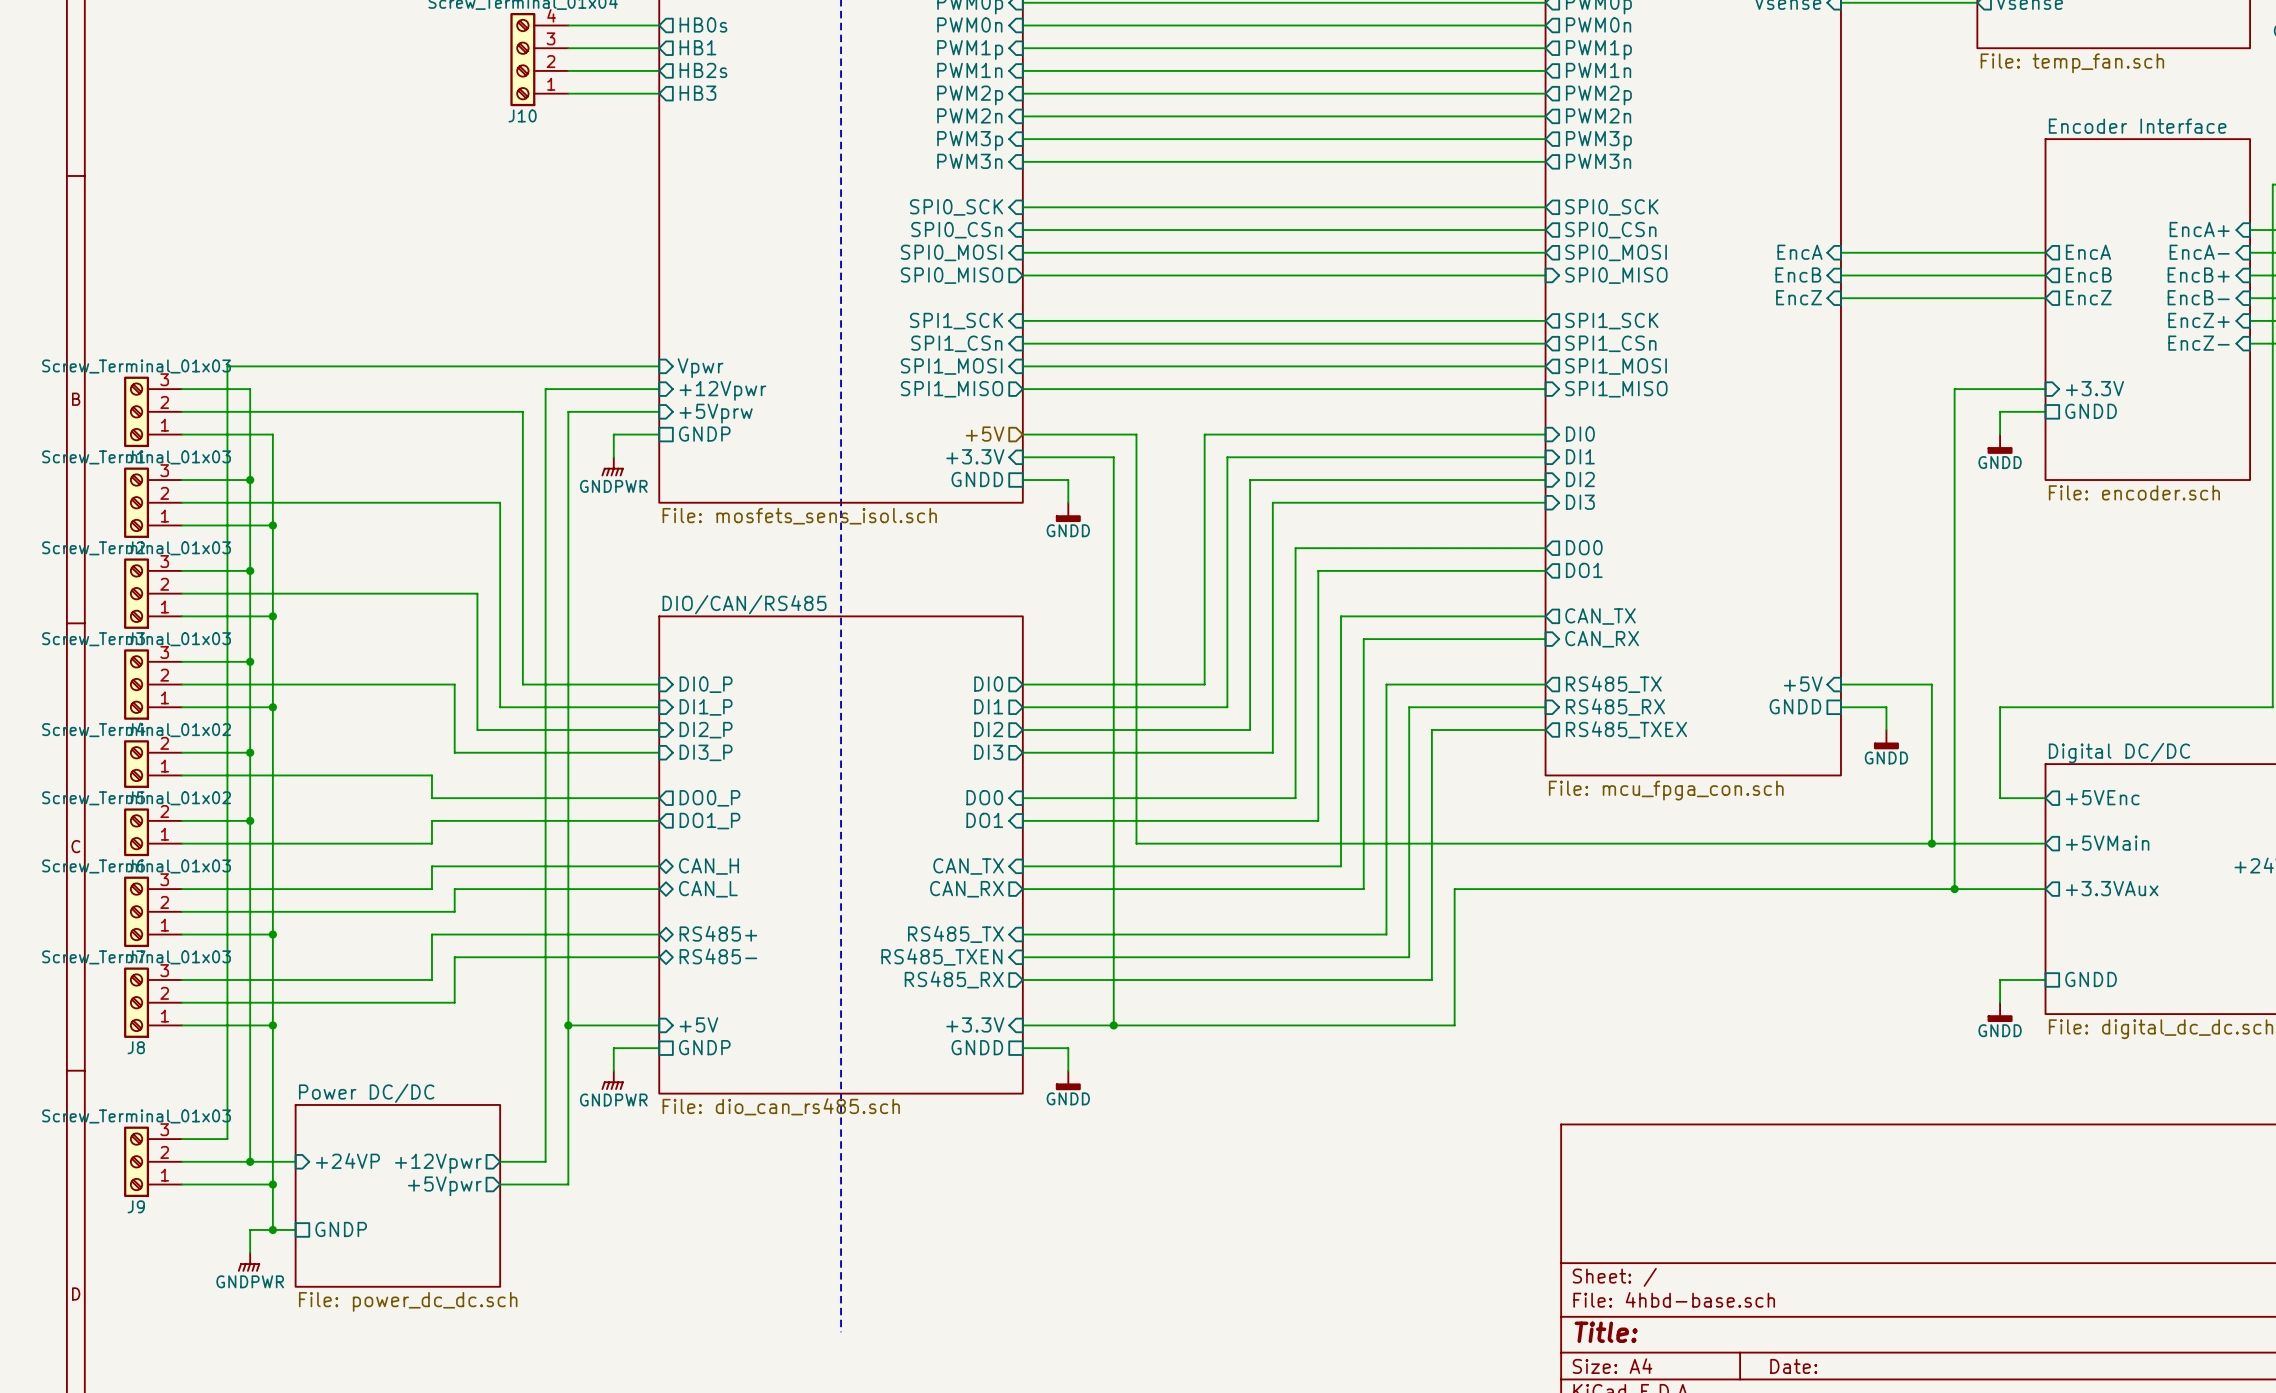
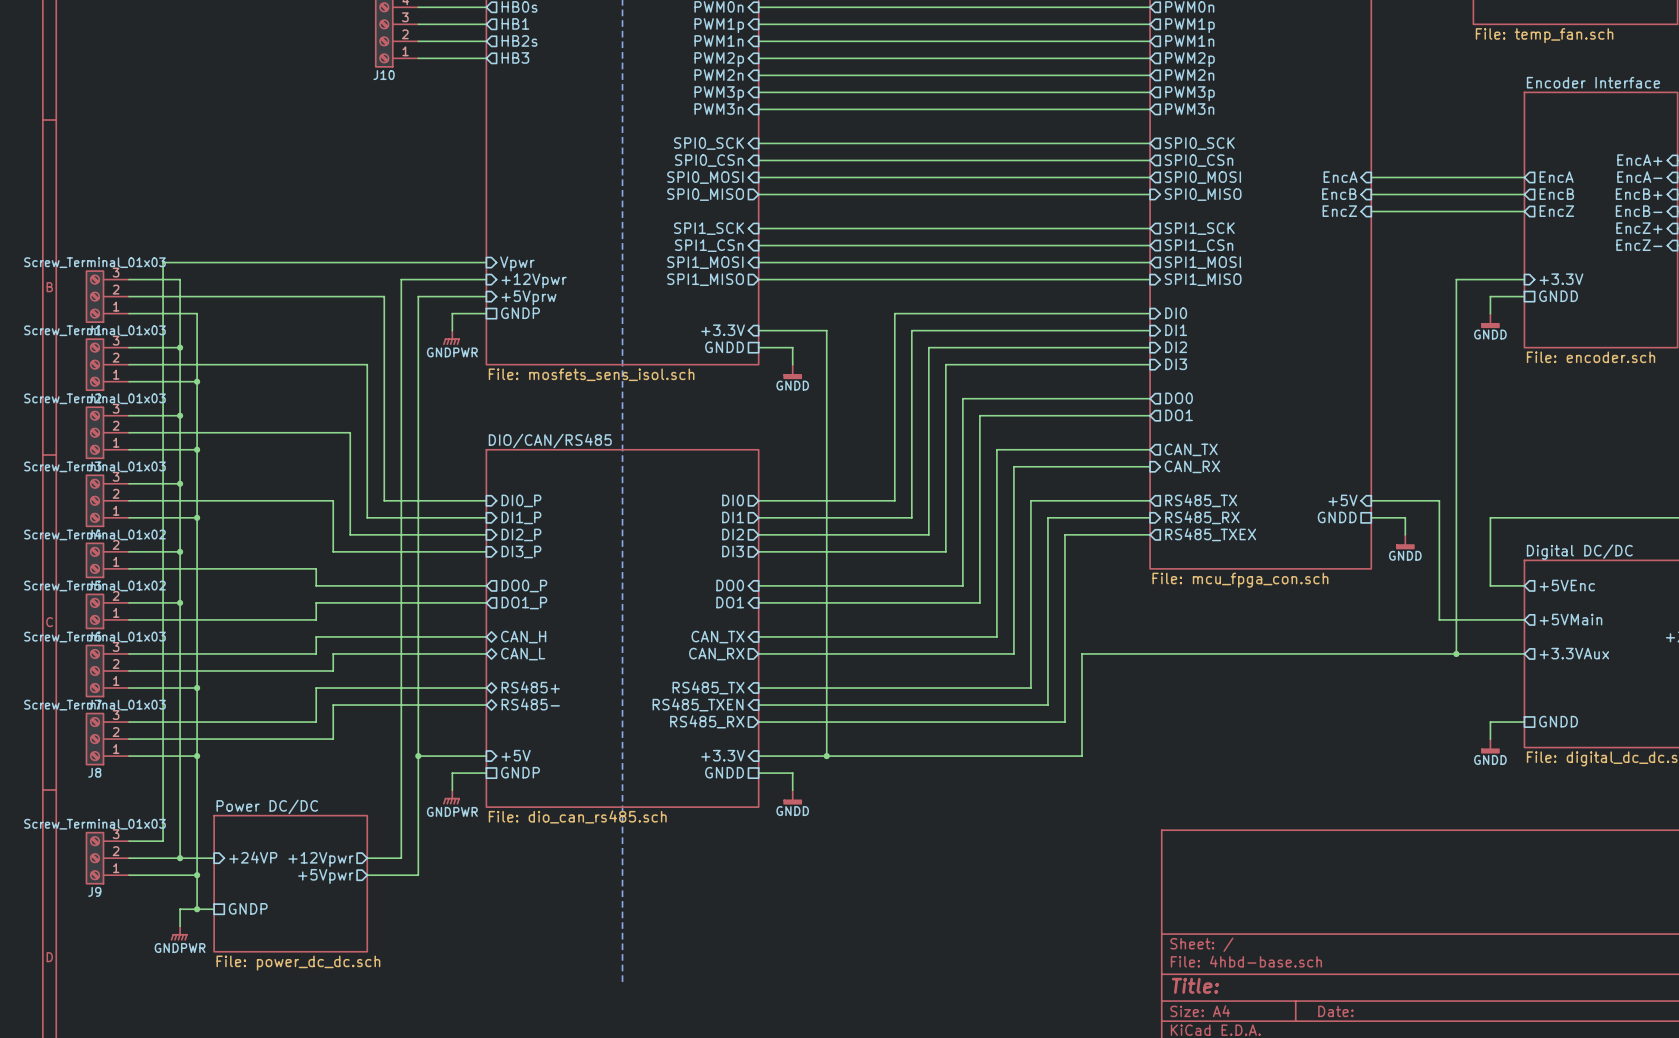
hierarchical label: +5V (985, 434) -> none
wire: (1022, 434) (1136, 434) (1136, 843) (1931, 843) -> none
junction: (1931, 843) -> none

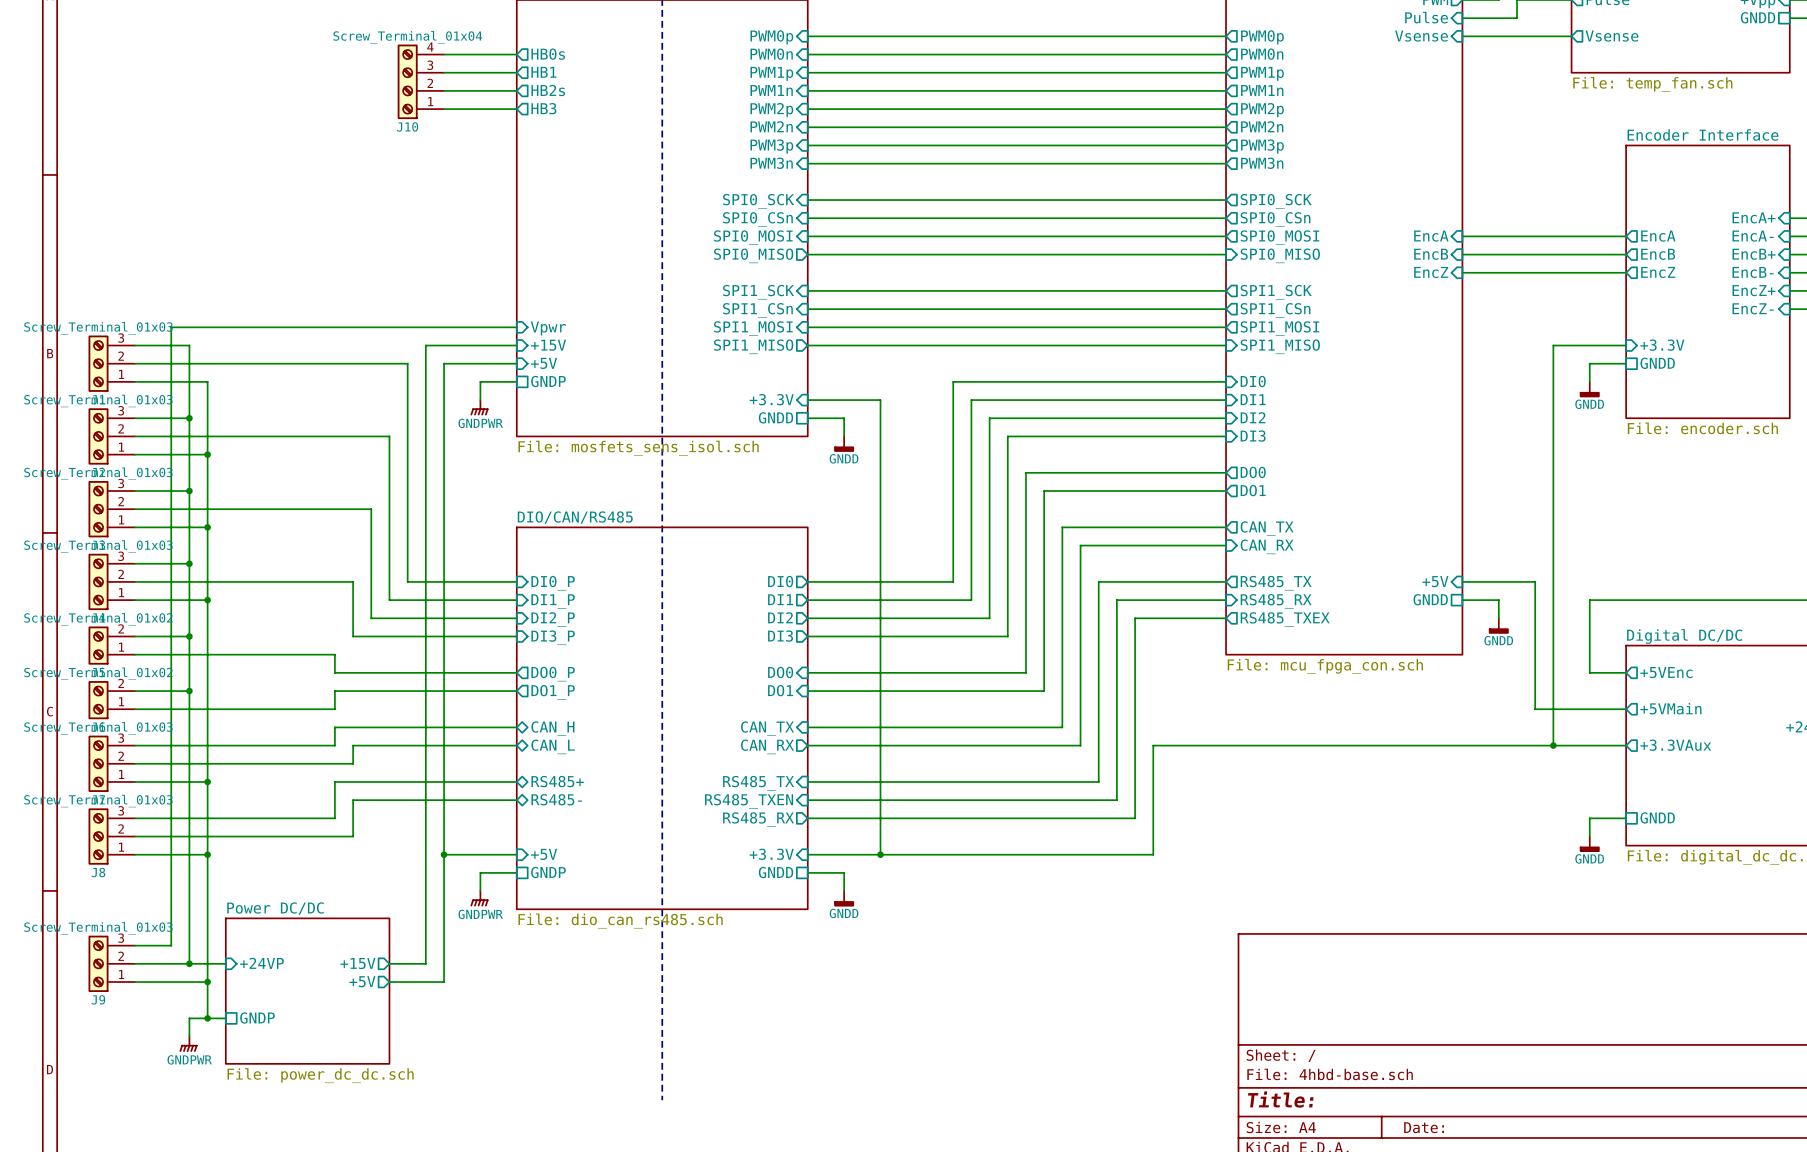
sheet pin: +12Vpwr (534, 280) -> +15V (548, 345)
sheet pin: +5Vprw (528, 297) -> +5V (544, 363)
sheet pin: +12Vpwr (321, 859) -> +15V (357, 963)
sheet pin: +5Vpwr (325, 876) -> +5V (362, 981)

